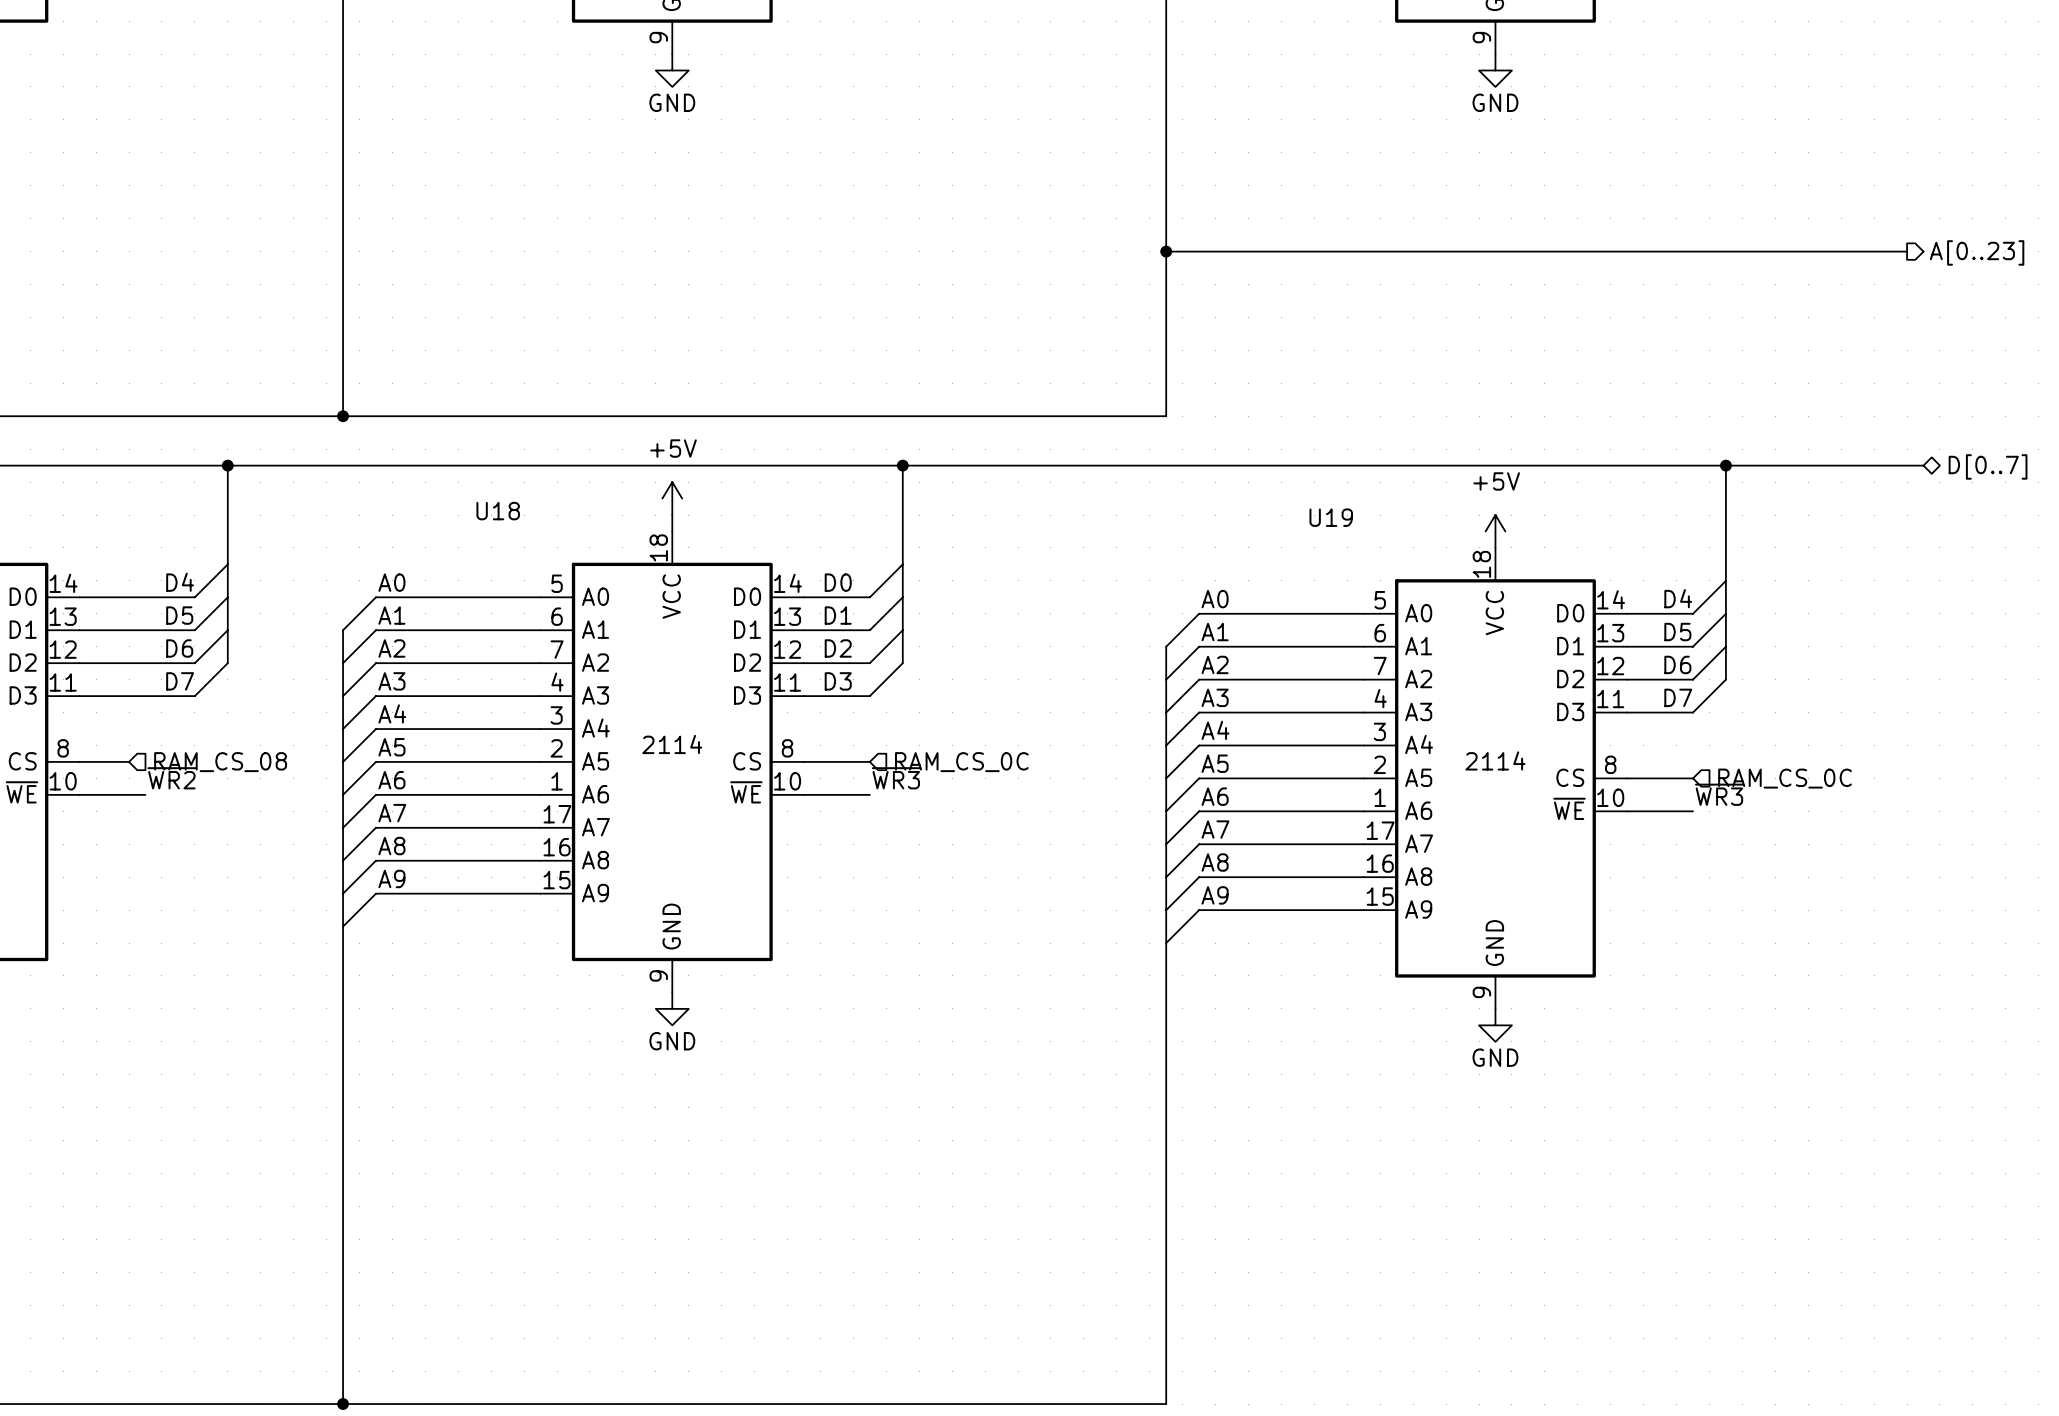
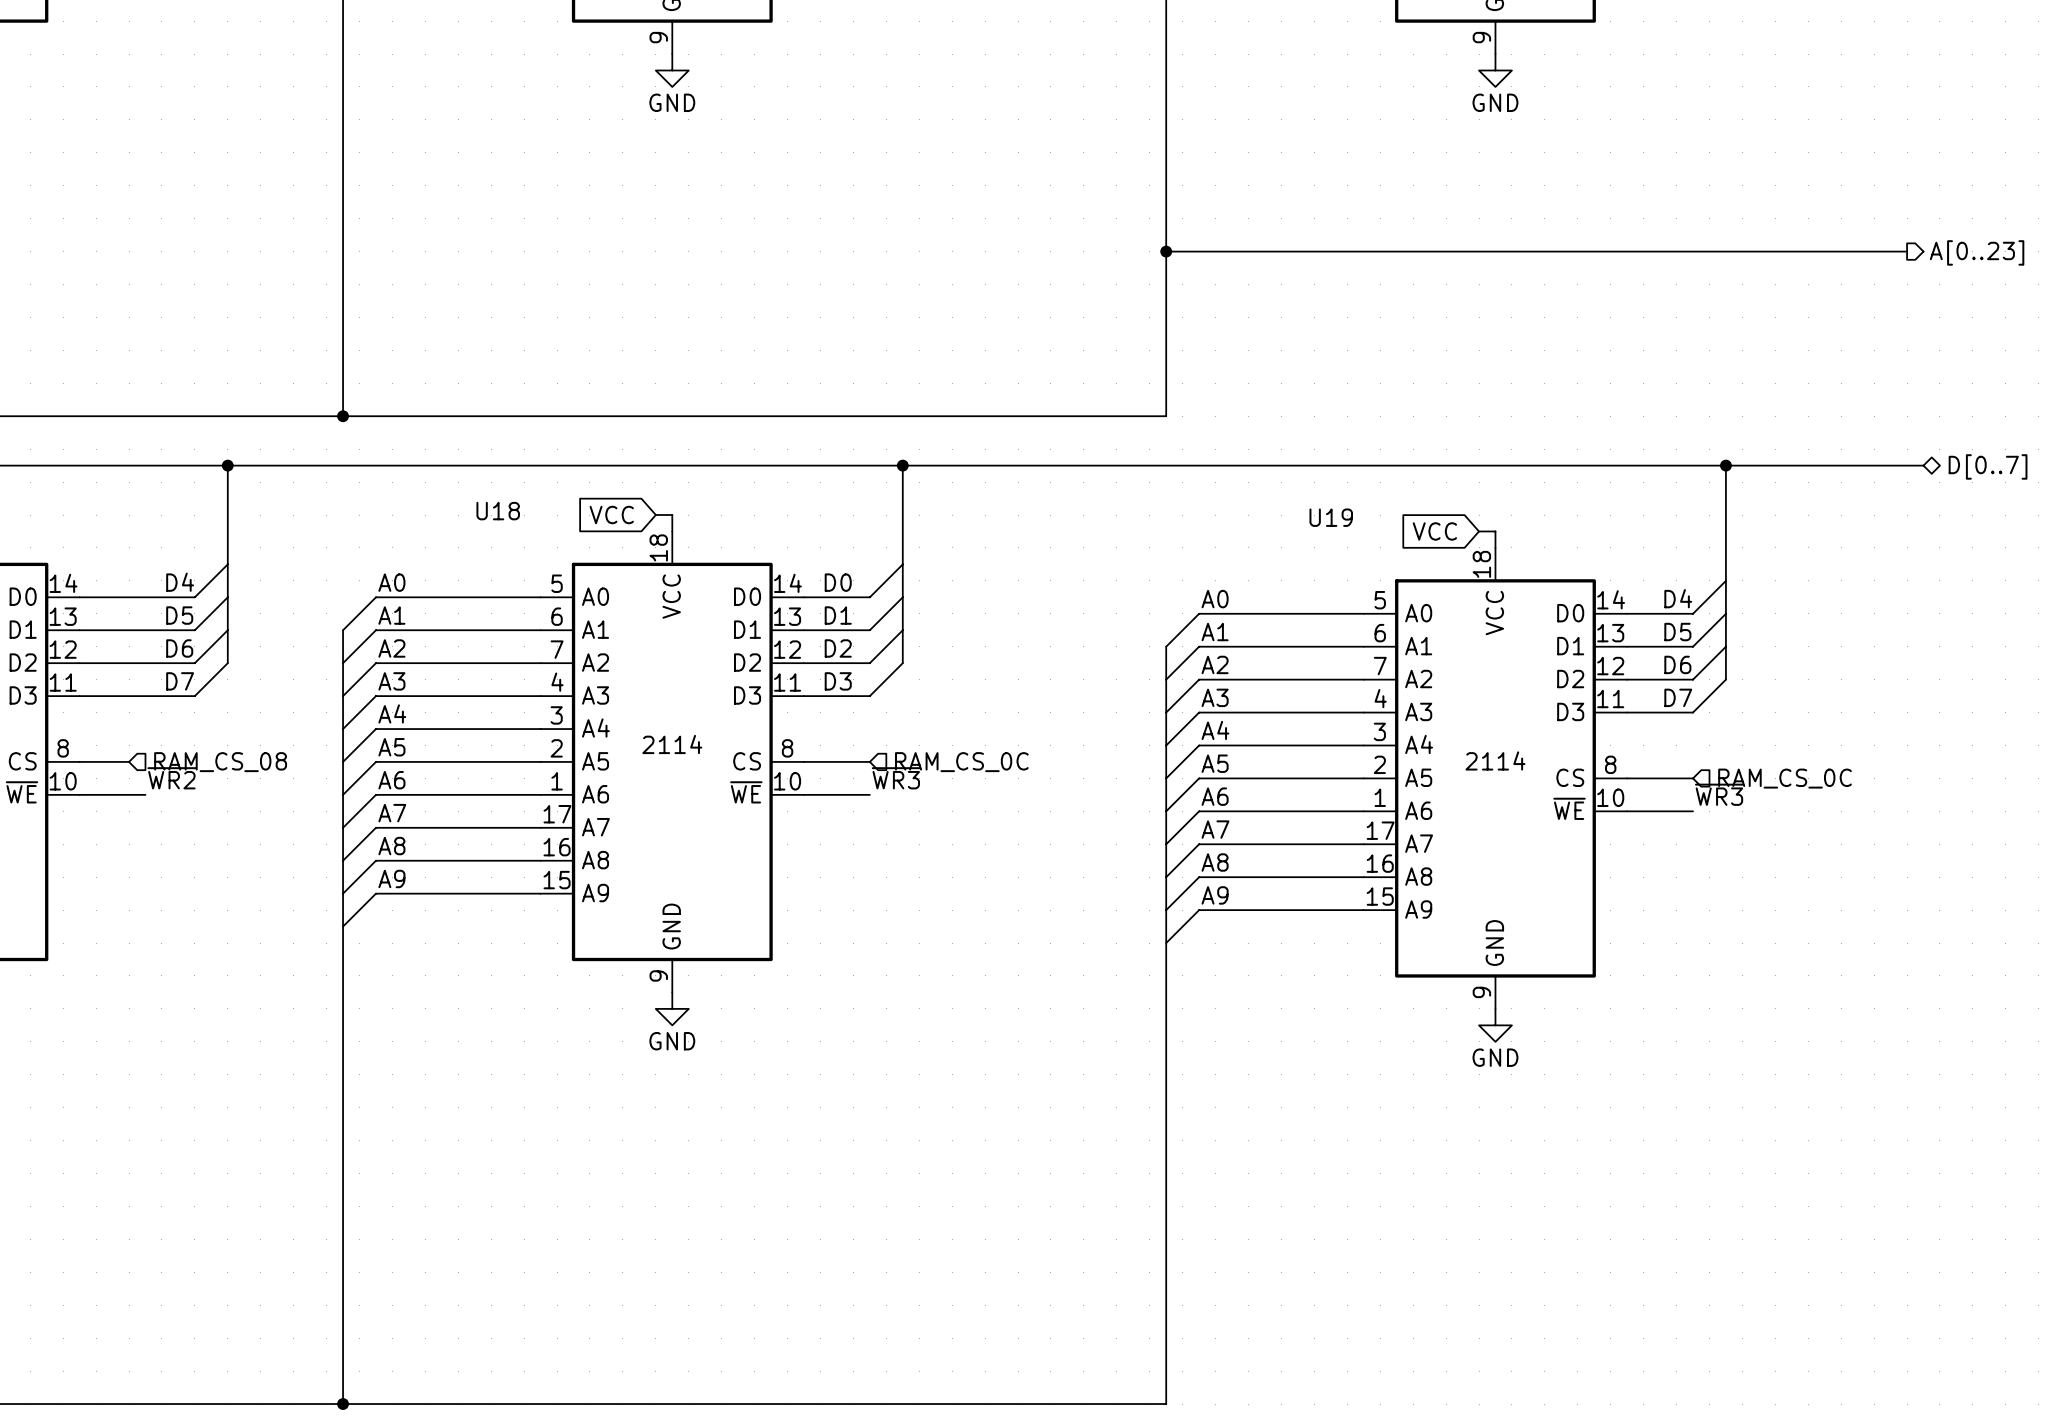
power symbol: +5V (672, 498) -> none
global label: none -> VCC (611, 515)
wire: none -> (655, 515) (672, 515)
global label: none -> VCC (1434, 531)
wire: none -> (1479, 531) (1495, 531) (1495, 547)
power symbol: +5V (1495, 531) -> none

